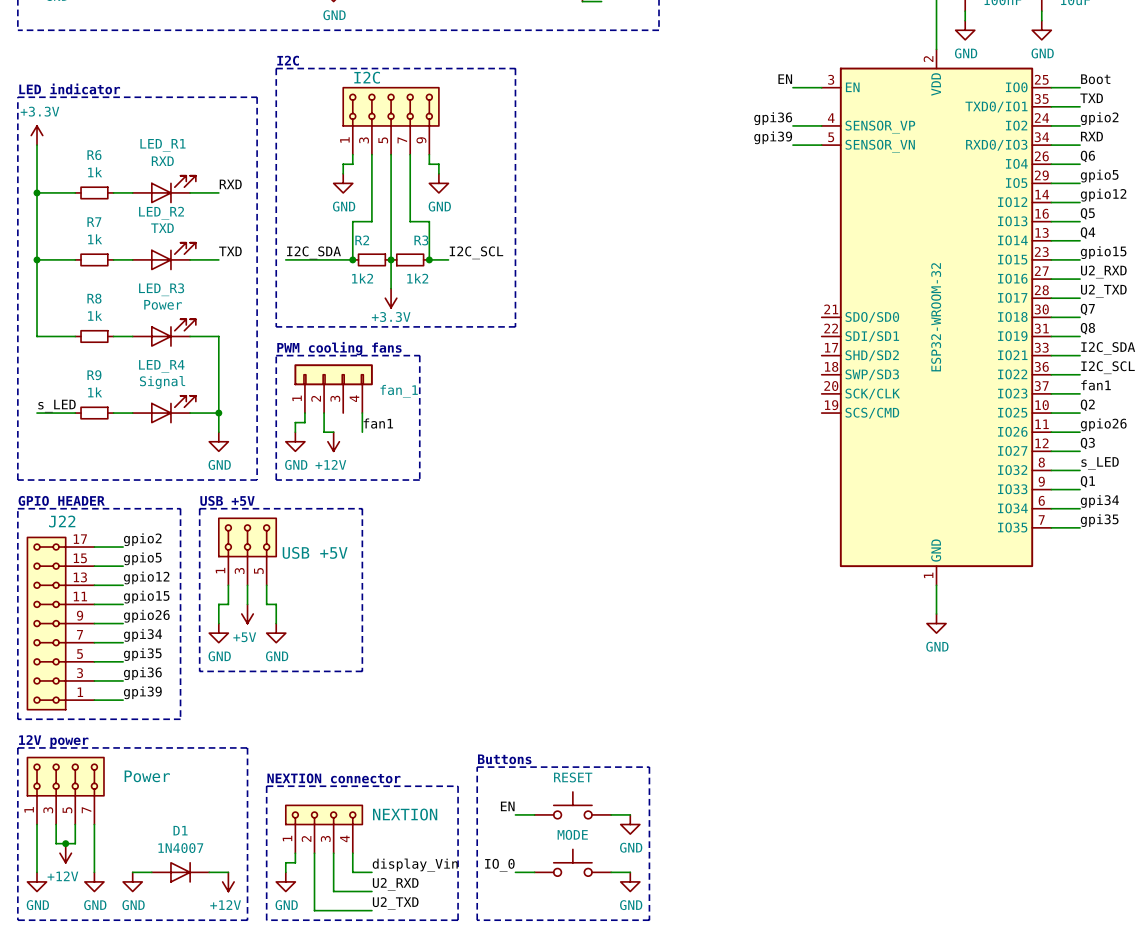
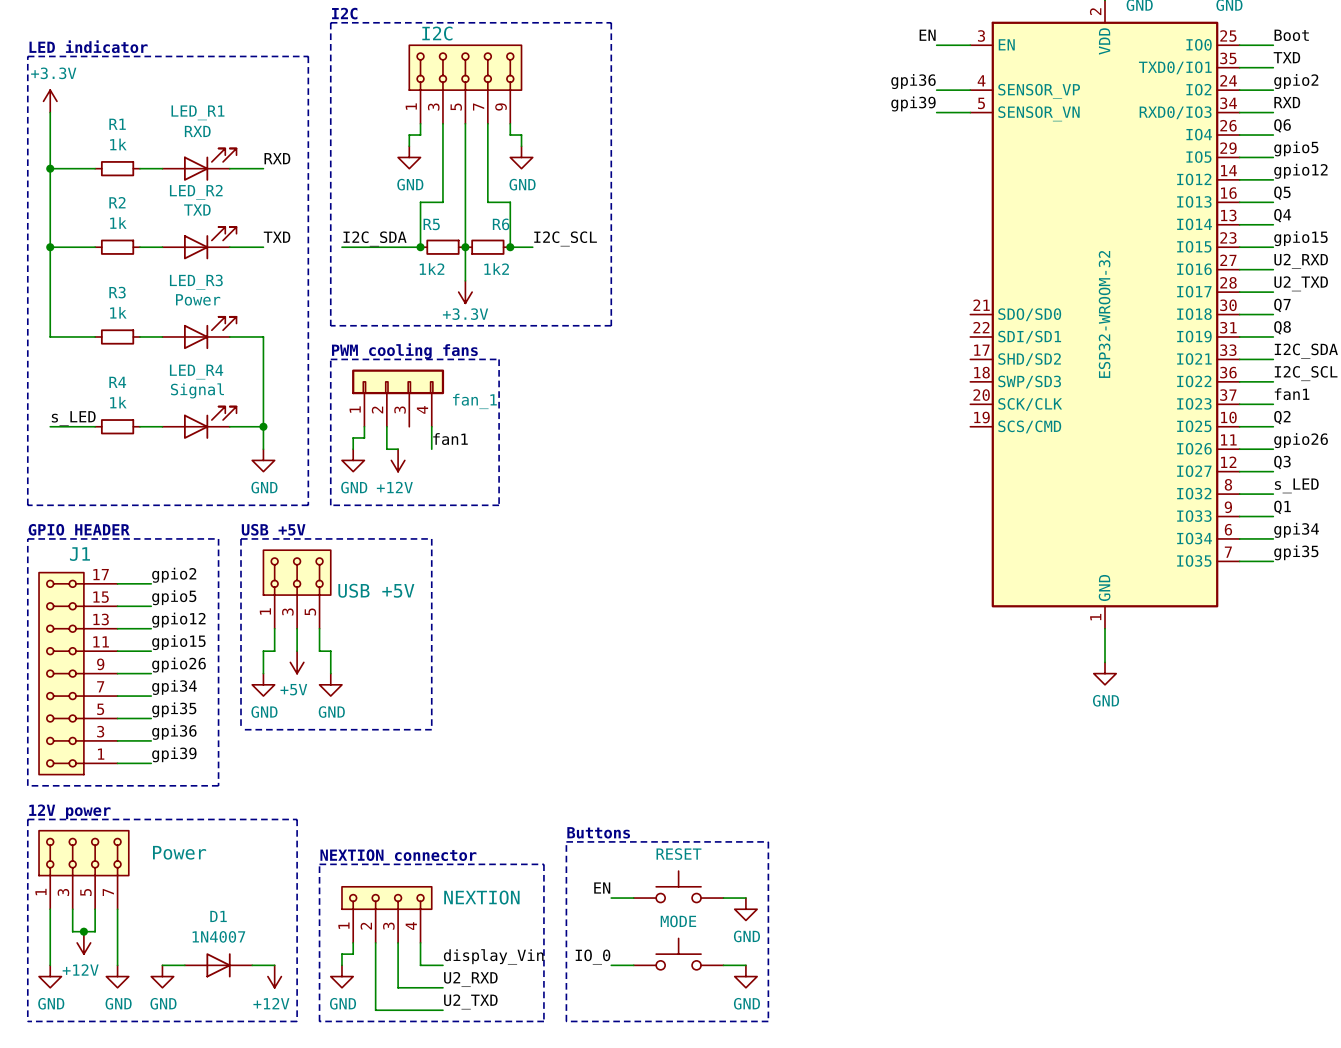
R6 name: R6 (94, 155) -> R1 (117, 124)
R7 name: R7 (94, 222) -> R2 (117, 202)
R2 name: R2 (362, 240) -> R5 (431, 224)
R3 name: R3 (421, 240) -> R6 (501, 224)
R8 name: R8 (94, 298) -> R3 (117, 292)
R9 name: R9 (94, 375) -> R4 (117, 382)
J22 name: J22 (62, 521) -> J1 (79, 554)

